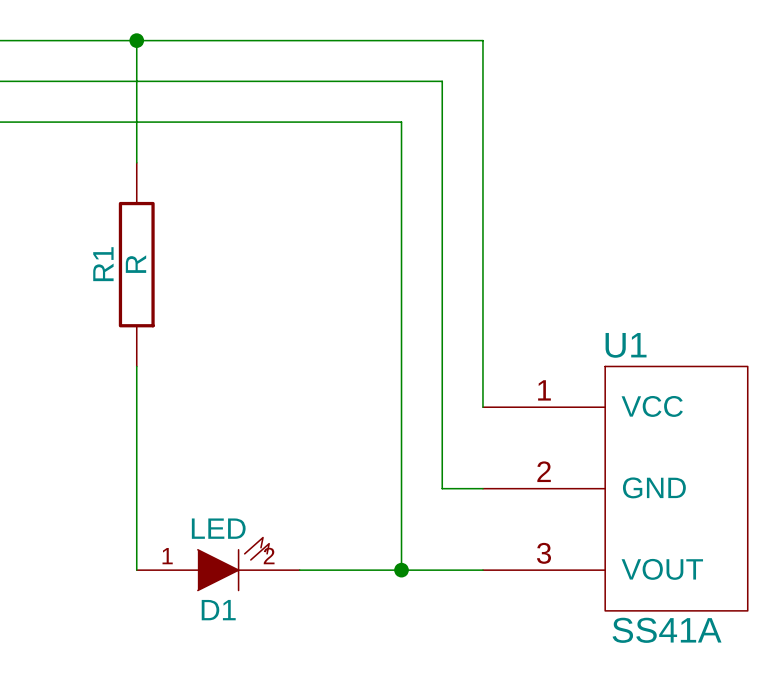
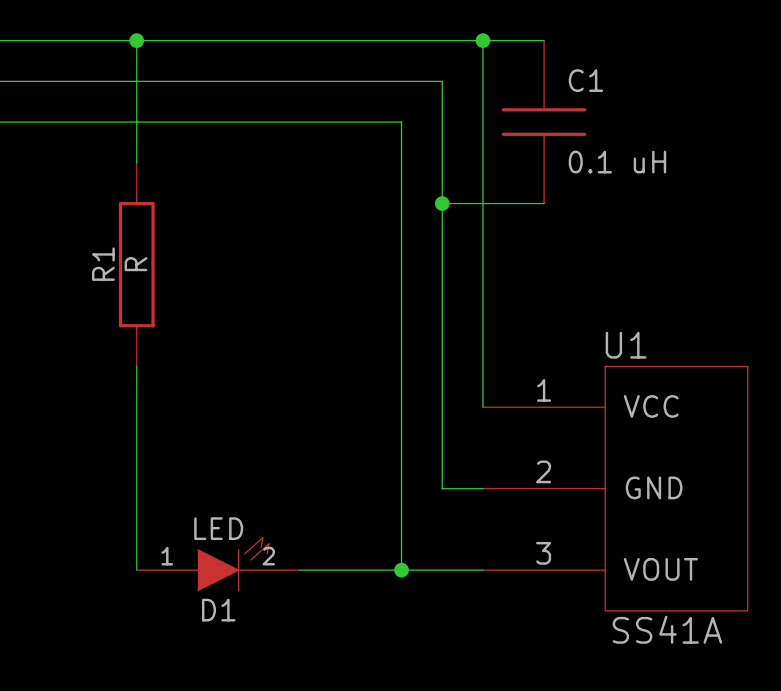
wire: none -> (482, 40) (544, 40)
junction: none -> (482, 40)
C1: none -> 0.1 uH (544, 122)
wire: none -> (442, 203) (544, 203)
junction: none -> (442, 203)

